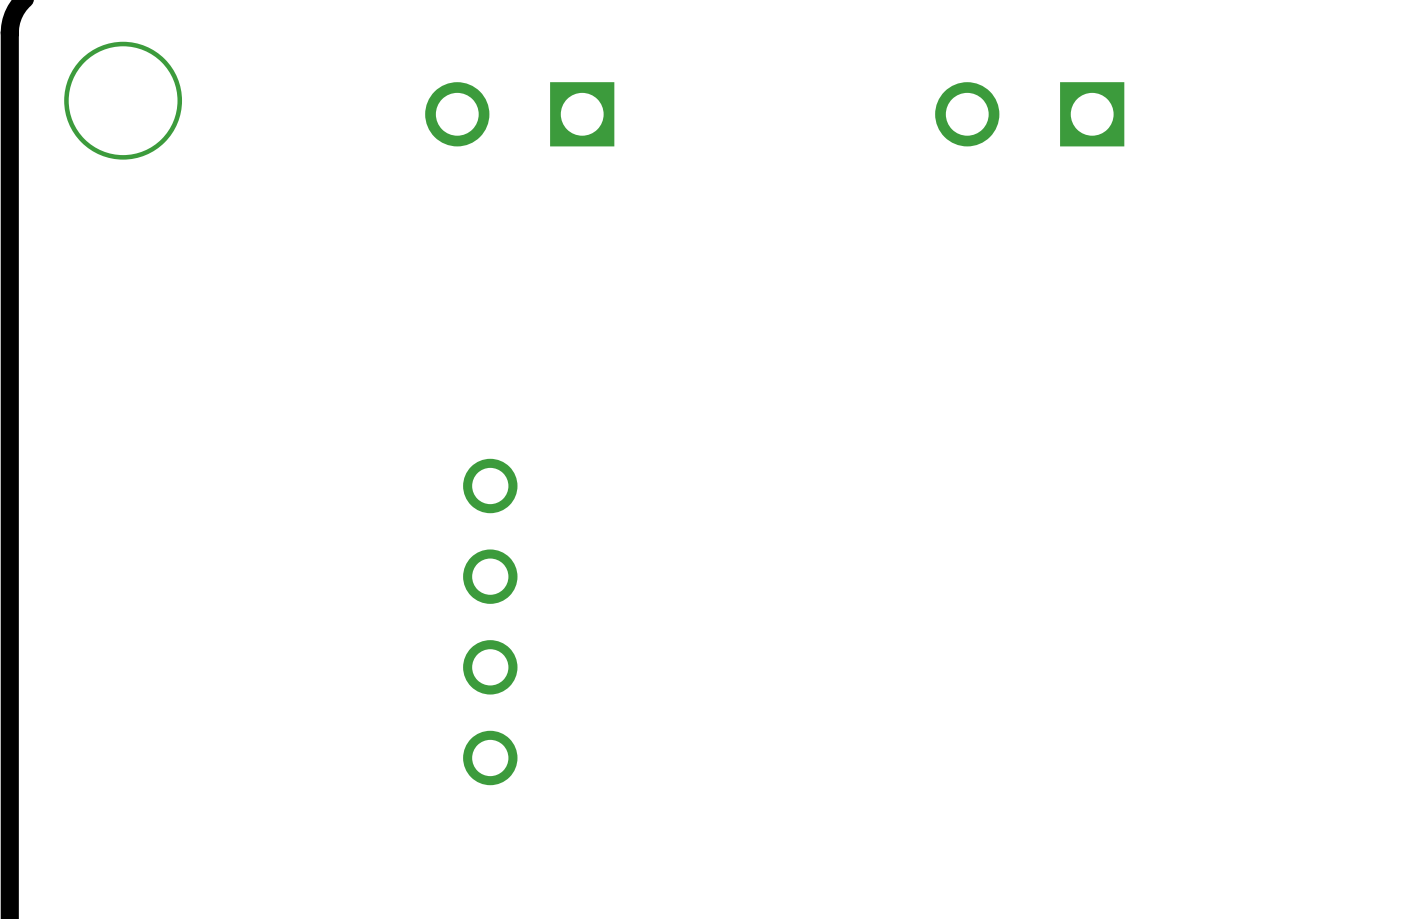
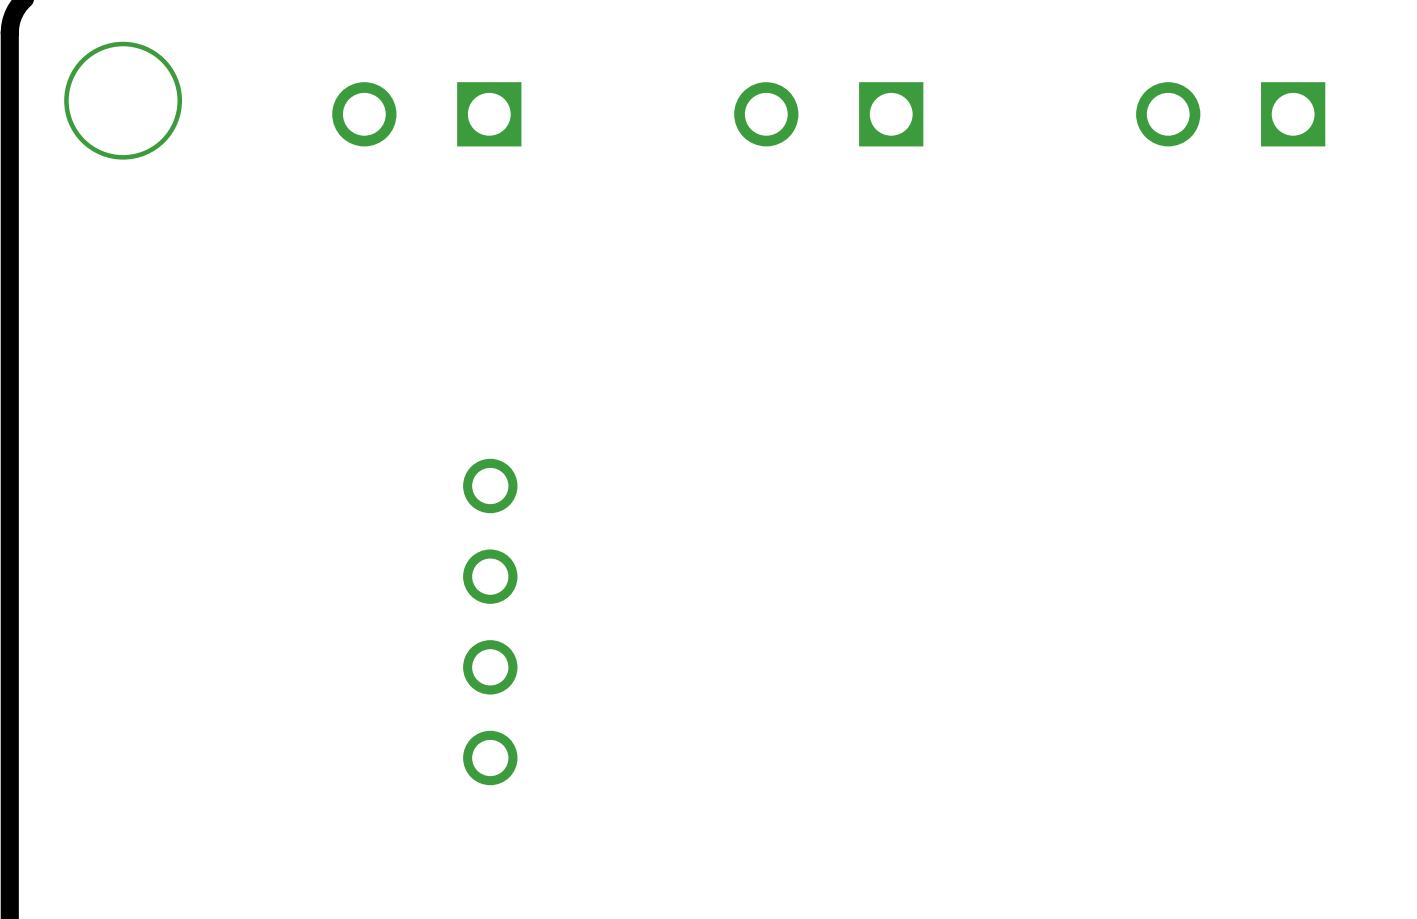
part position: (519, 114) -> (426, 114)
part: none -> (828, 114)
part: (1029, 114) -> none
part: none -> (1230, 114)

